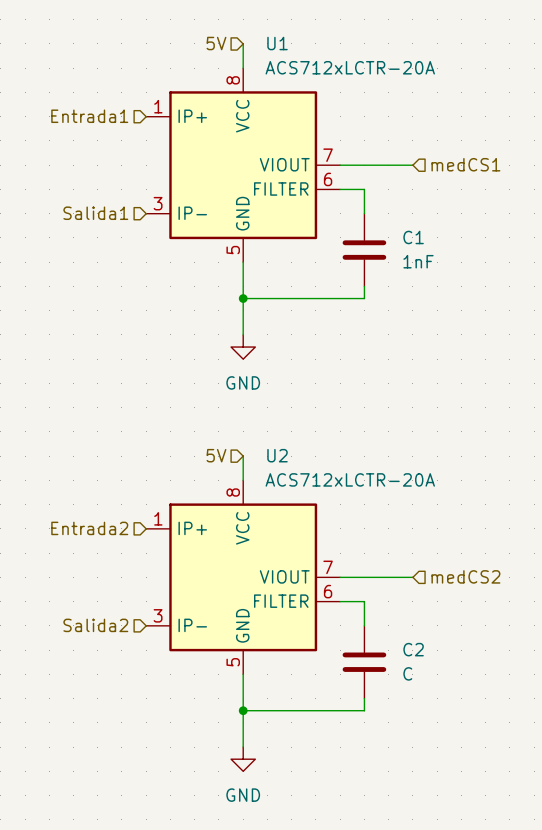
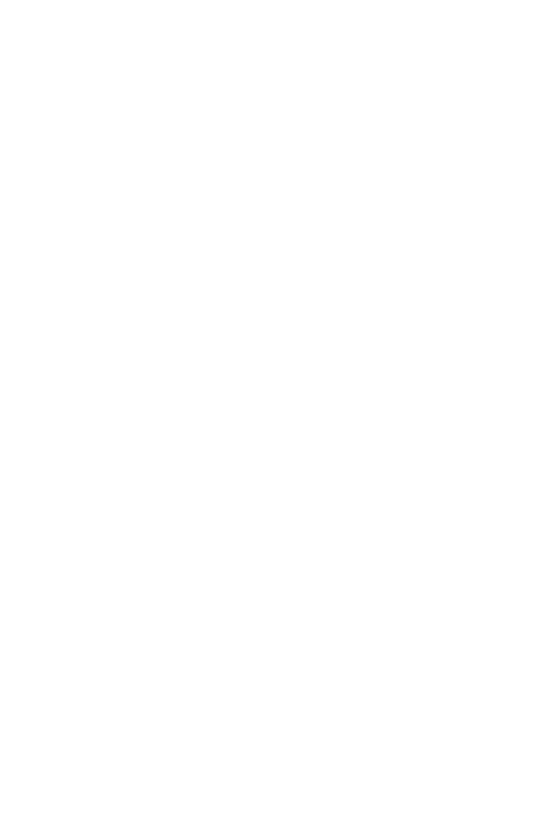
hierarchical label: 5V (216, 43) -> none
wire: (243, 43) (243, 68) -> none
hierarchical label: Entrada1 (89, 116) -> none
hierarchical label: medCS1 (465, 164) -> none
U1: ACS712xLCTR-20A (243, 165) -> none
wire: (340, 165) (412, 165) -> none
wire: (340, 189) (364, 189) (364, 213) -> none
hierarchical label: Salida1 (95, 213) -> none
C1: 1nF (364, 250) -> none
wire: (243, 262) (243, 334) -> none
wire: (364, 286) (364, 298) (243, 298) -> none
junction: (243, 298) -> none
power symbol: GND (243, 347) -> none
hierarchical label: 5V (216, 455) -> none
wire: (243, 456) (243, 480) -> none
hierarchical label: Entrada2 (89, 528) -> none
hierarchical label: medCS2 (465, 576) -> none
U2: ACS712xLCTR-20A (243, 577) -> none
wire: (340, 577) (412, 577) -> none
wire: (340, 601) (364, 601) (364, 625) -> none
hierarchical label: Salida2 (95, 625) -> none
C2: C (364, 662) -> none
wire: (243, 674) (243, 747) -> none
wire: (364, 698) (364, 710) (243, 710) -> none
junction: (243, 710) -> none
power symbol: GND (243, 759) -> none

